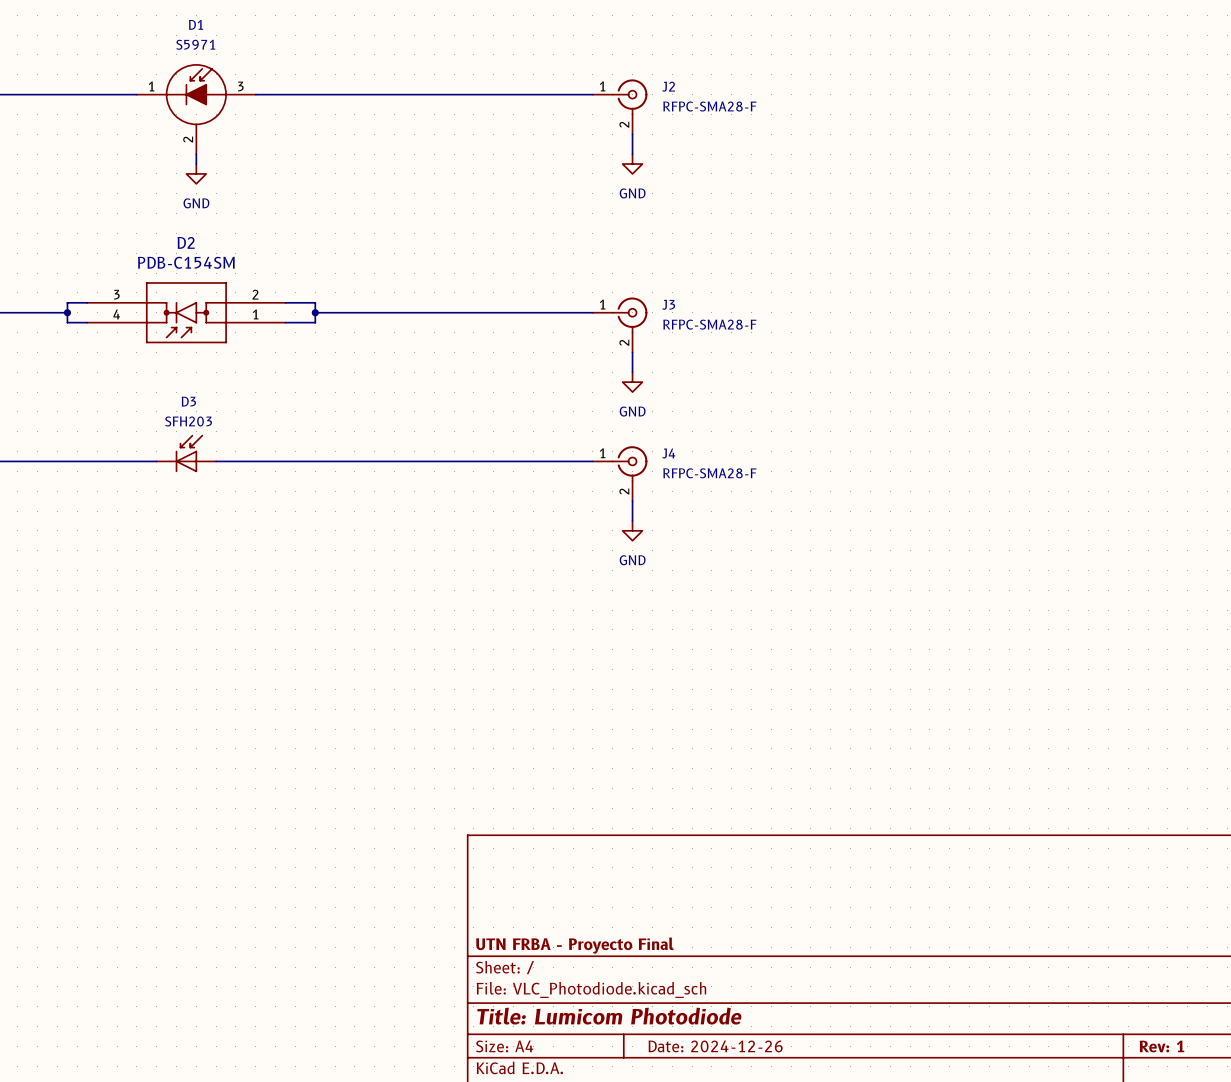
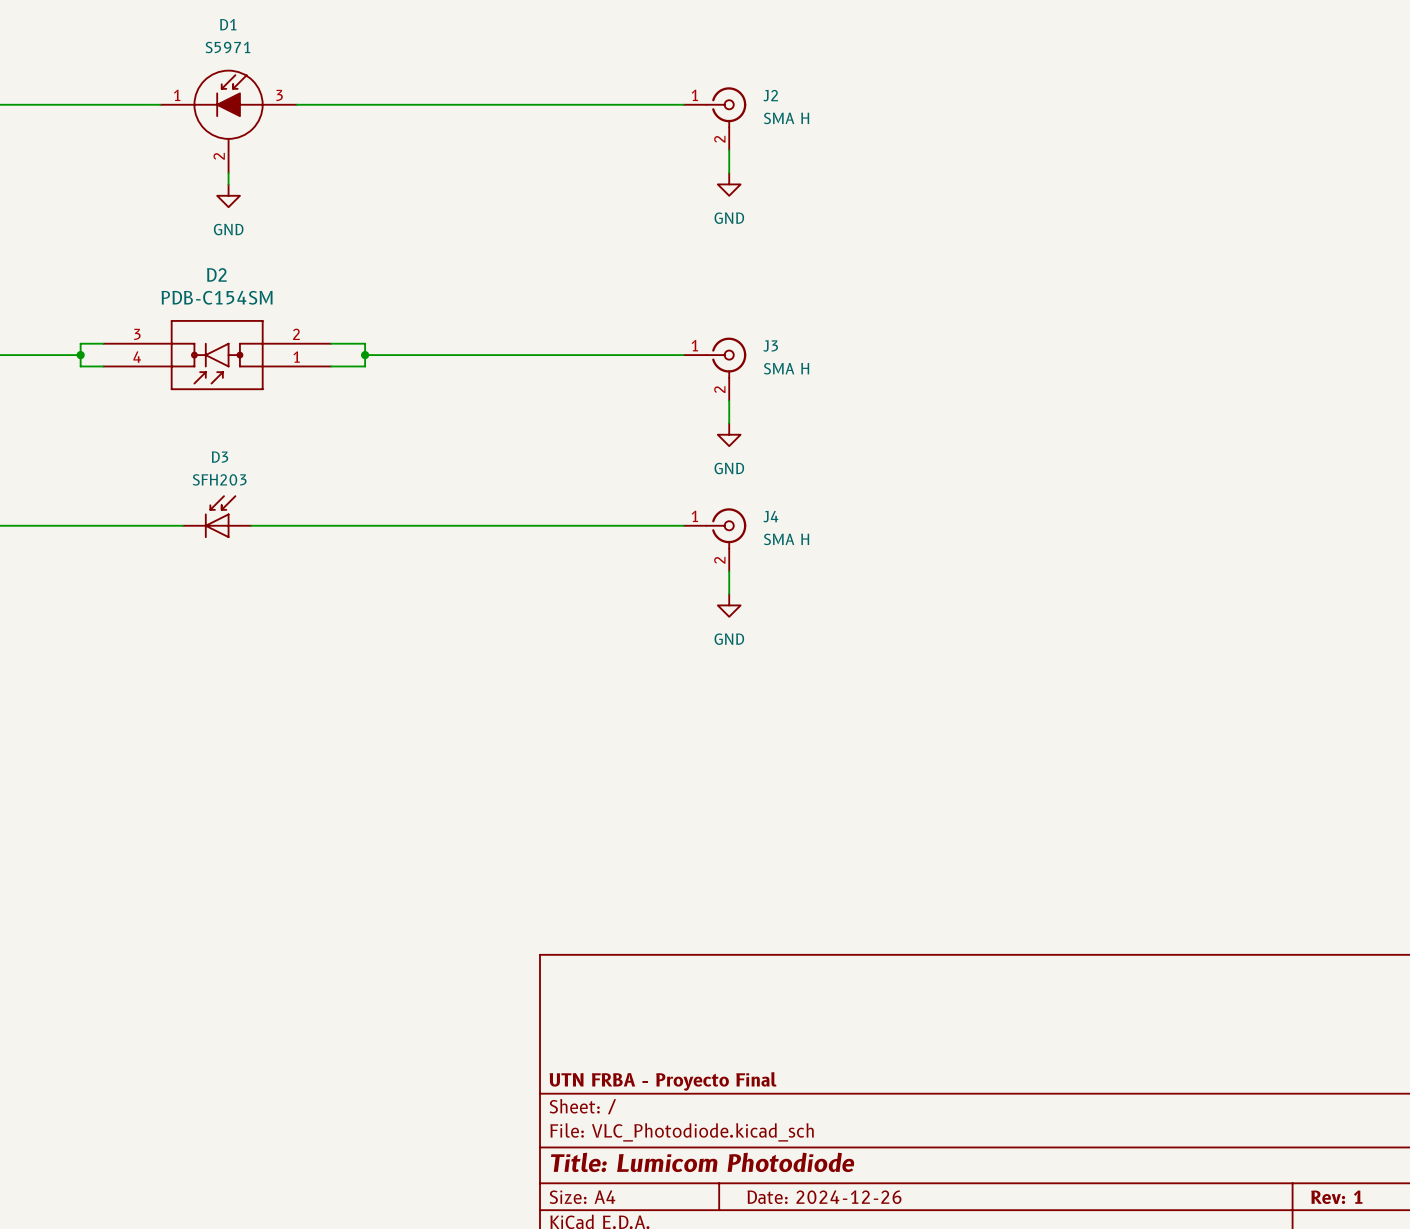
J2 value: RFPC-SMA28-F (709, 106) -> SMA H (786, 118)
J3 value: RFPC-SMA28-F (709, 324) -> SMA H (786, 368)
J4 value: RFPC-SMA28-F (709, 473) -> SMA H (786, 539)

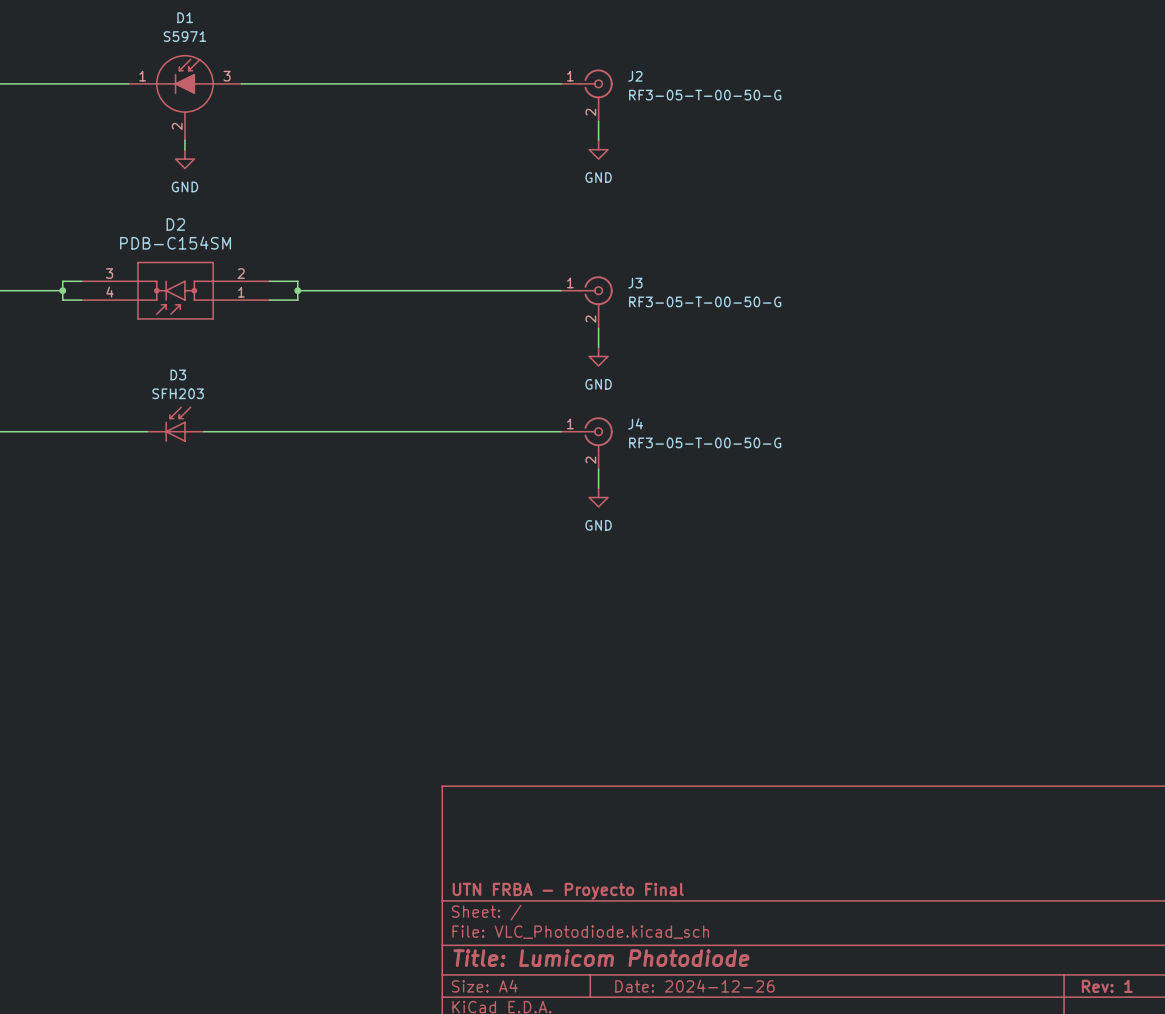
J2 value: SMA H (786, 118) -> RF3-05-T-00-50-G (705, 95)
J3 value: SMA H (786, 368) -> RF3-05-T-00-50-G (705, 301)
J4 value: SMA H (786, 539) -> RF3-05-T-00-50-G (705, 442)

